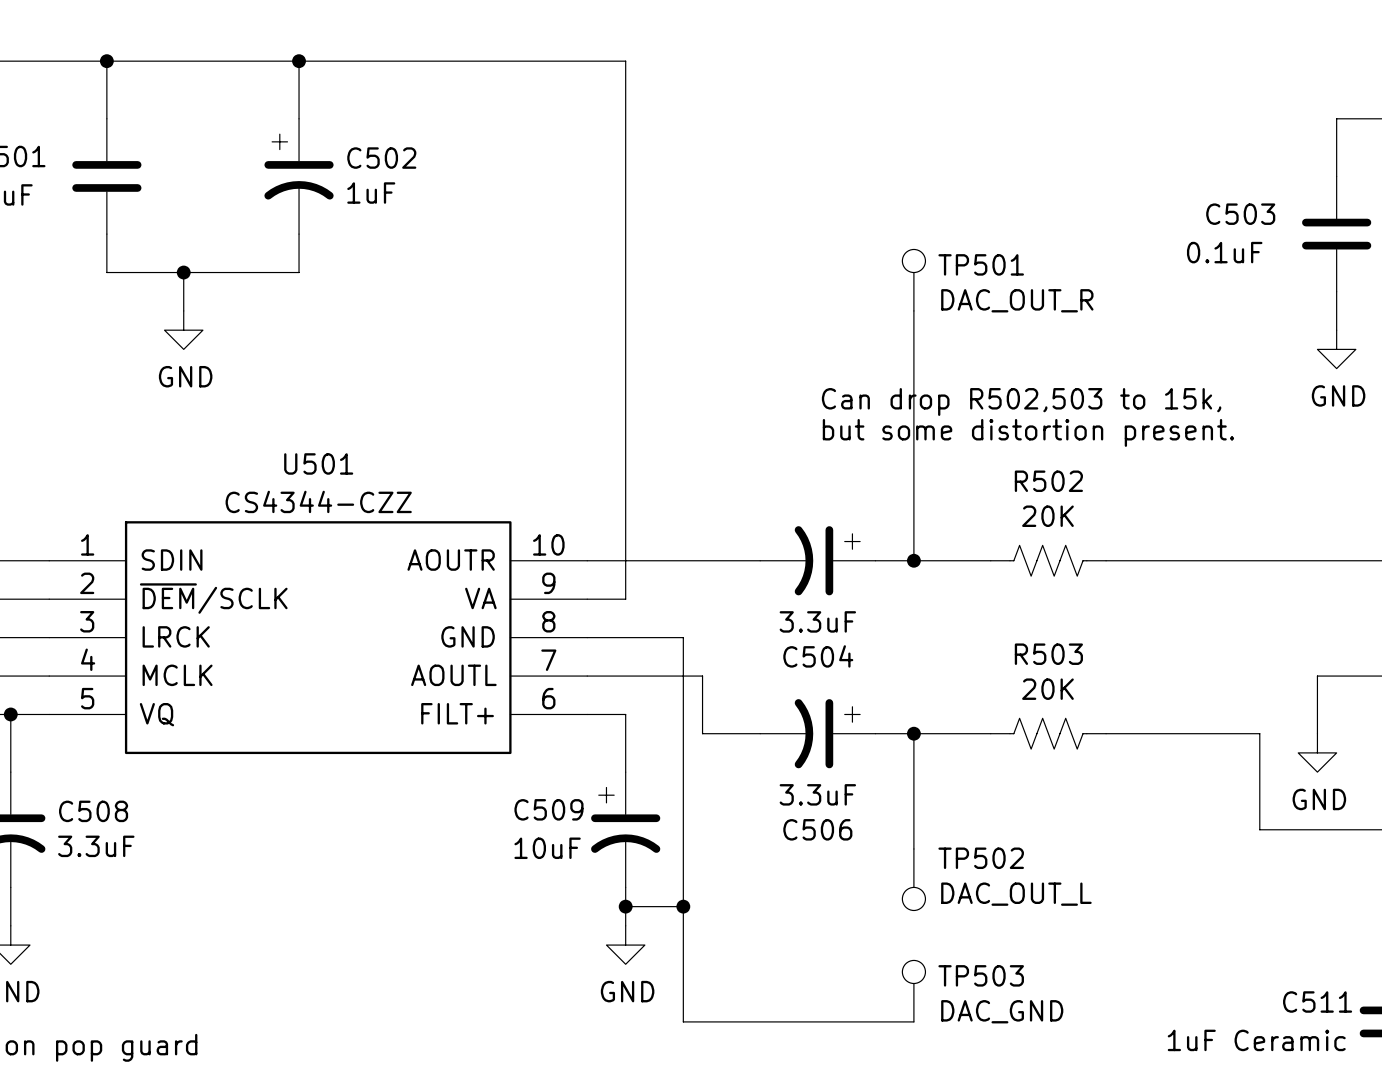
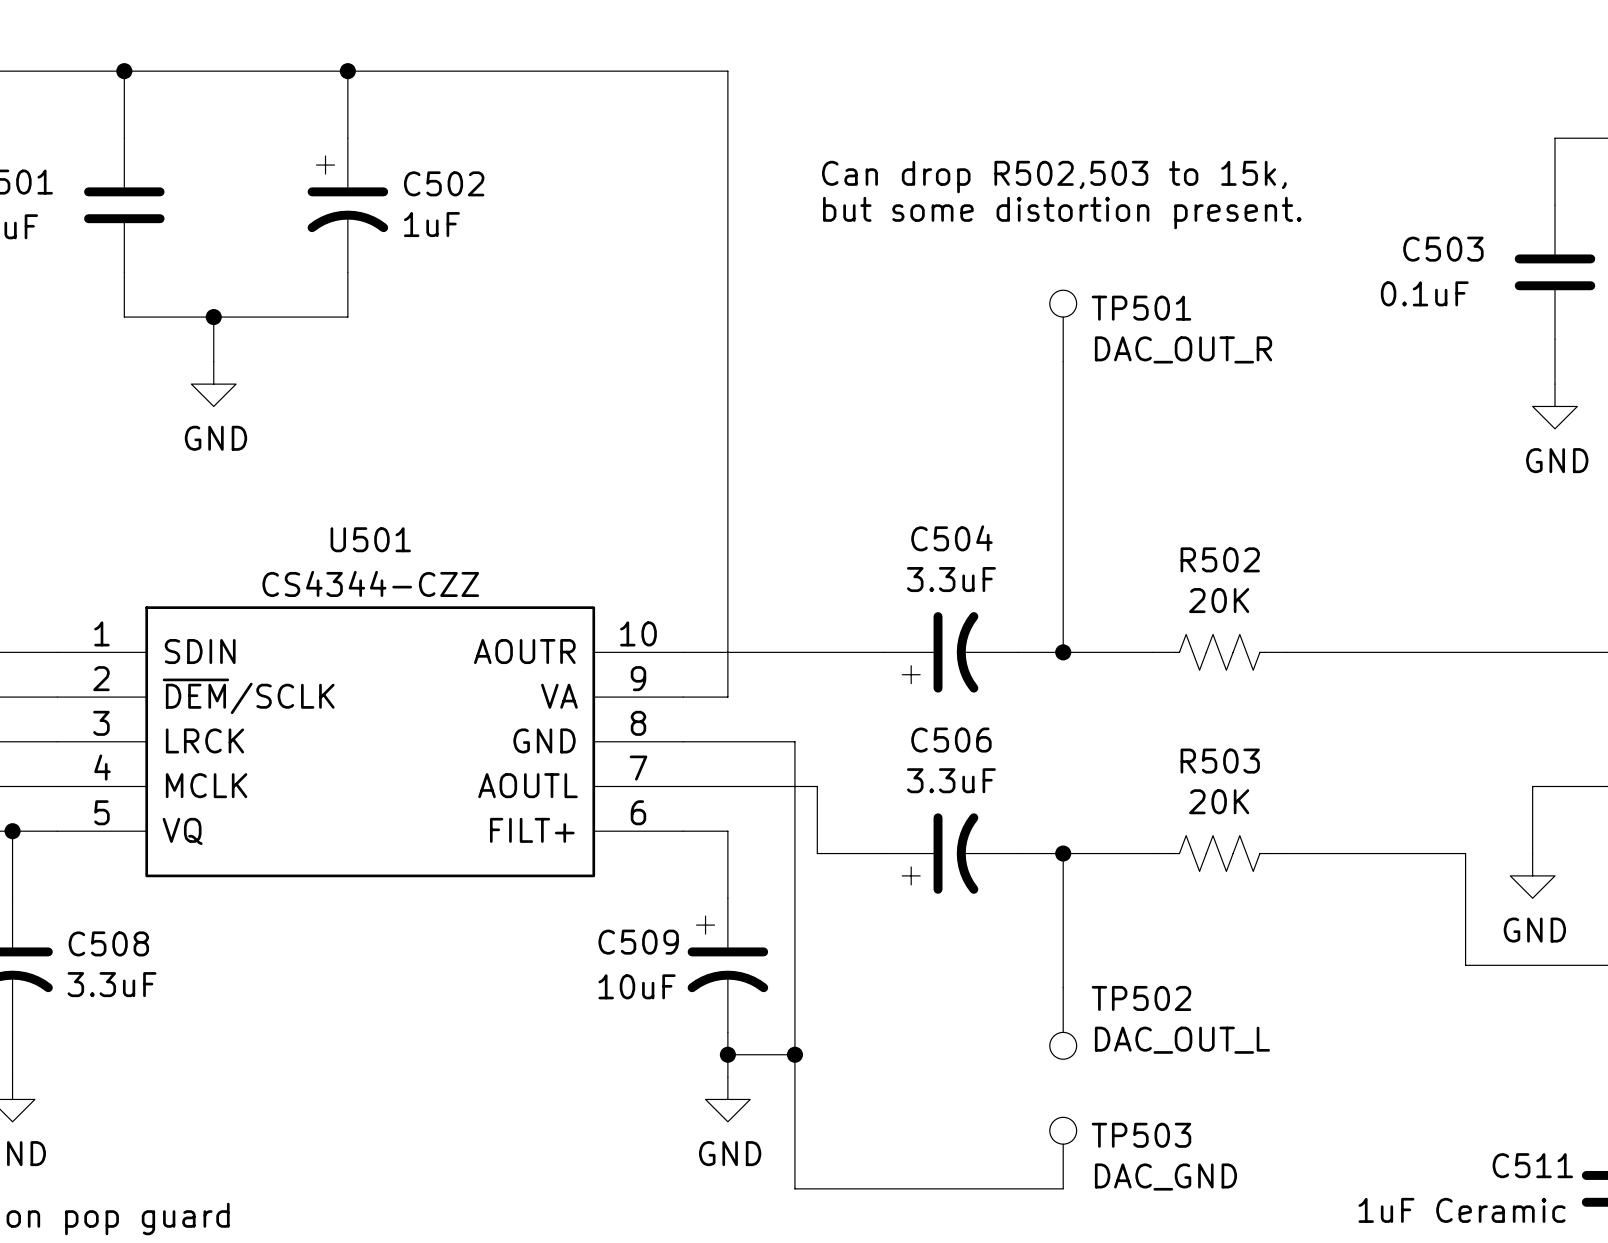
text position: Can drop R502,503 to 15k, (1021, 401) -> Can drop R502,503 to 15k, (1054, 177)
text position: but some distortion present. (1028, 432) -> but some distortion present. (1062, 213)
C504 rotation: 0° (827, 560) -> 180° (940, 652)
C506 rotation: 0° (827, 733) -> 180° (940, 853)

